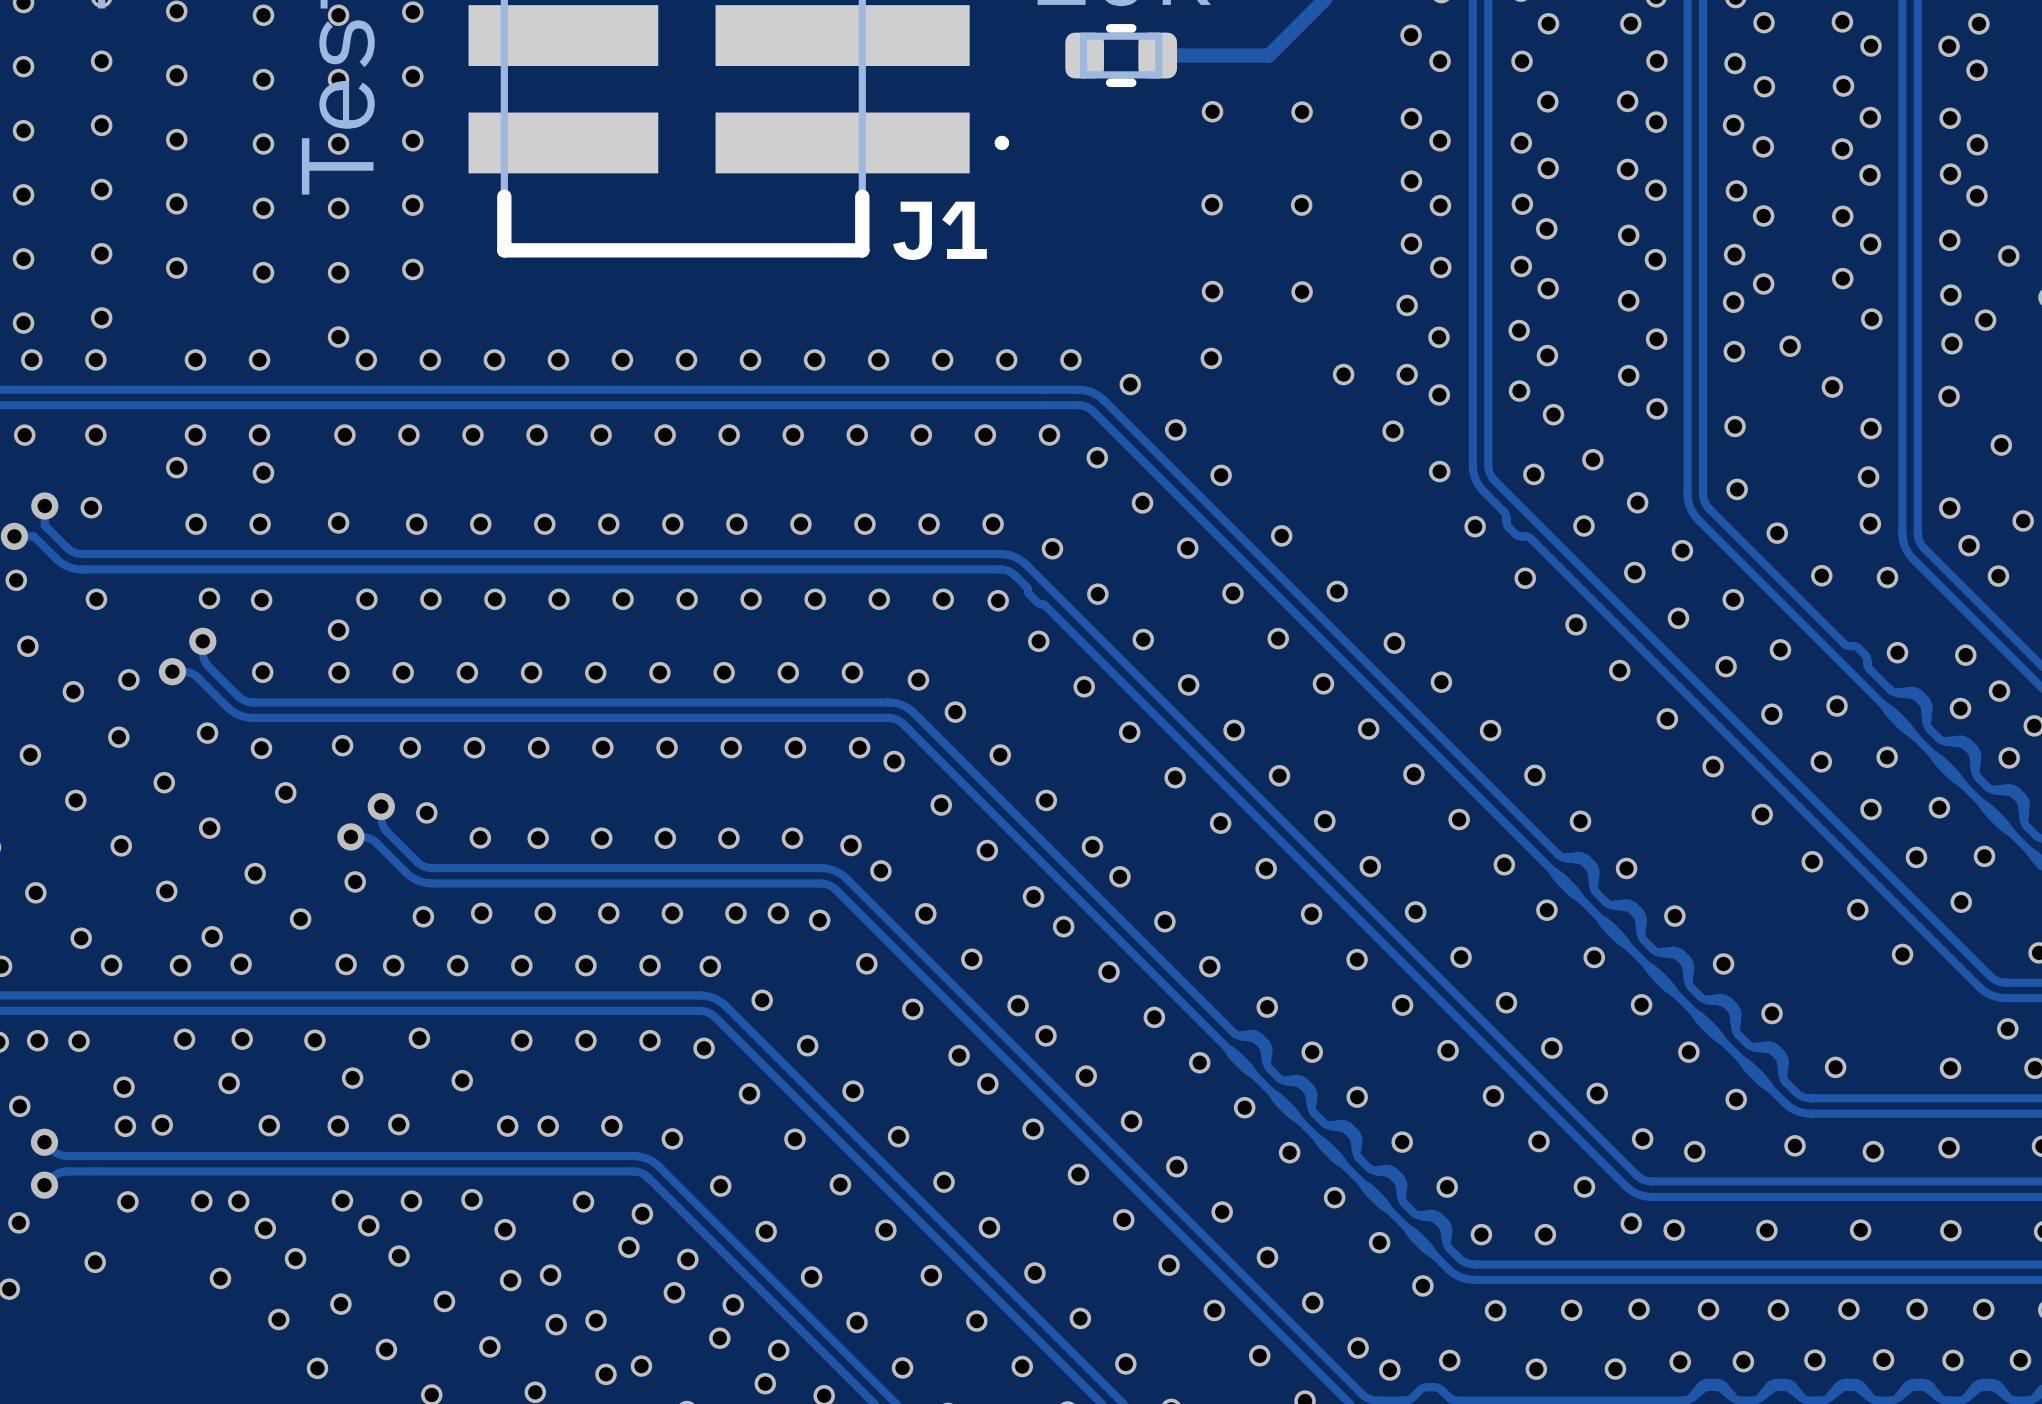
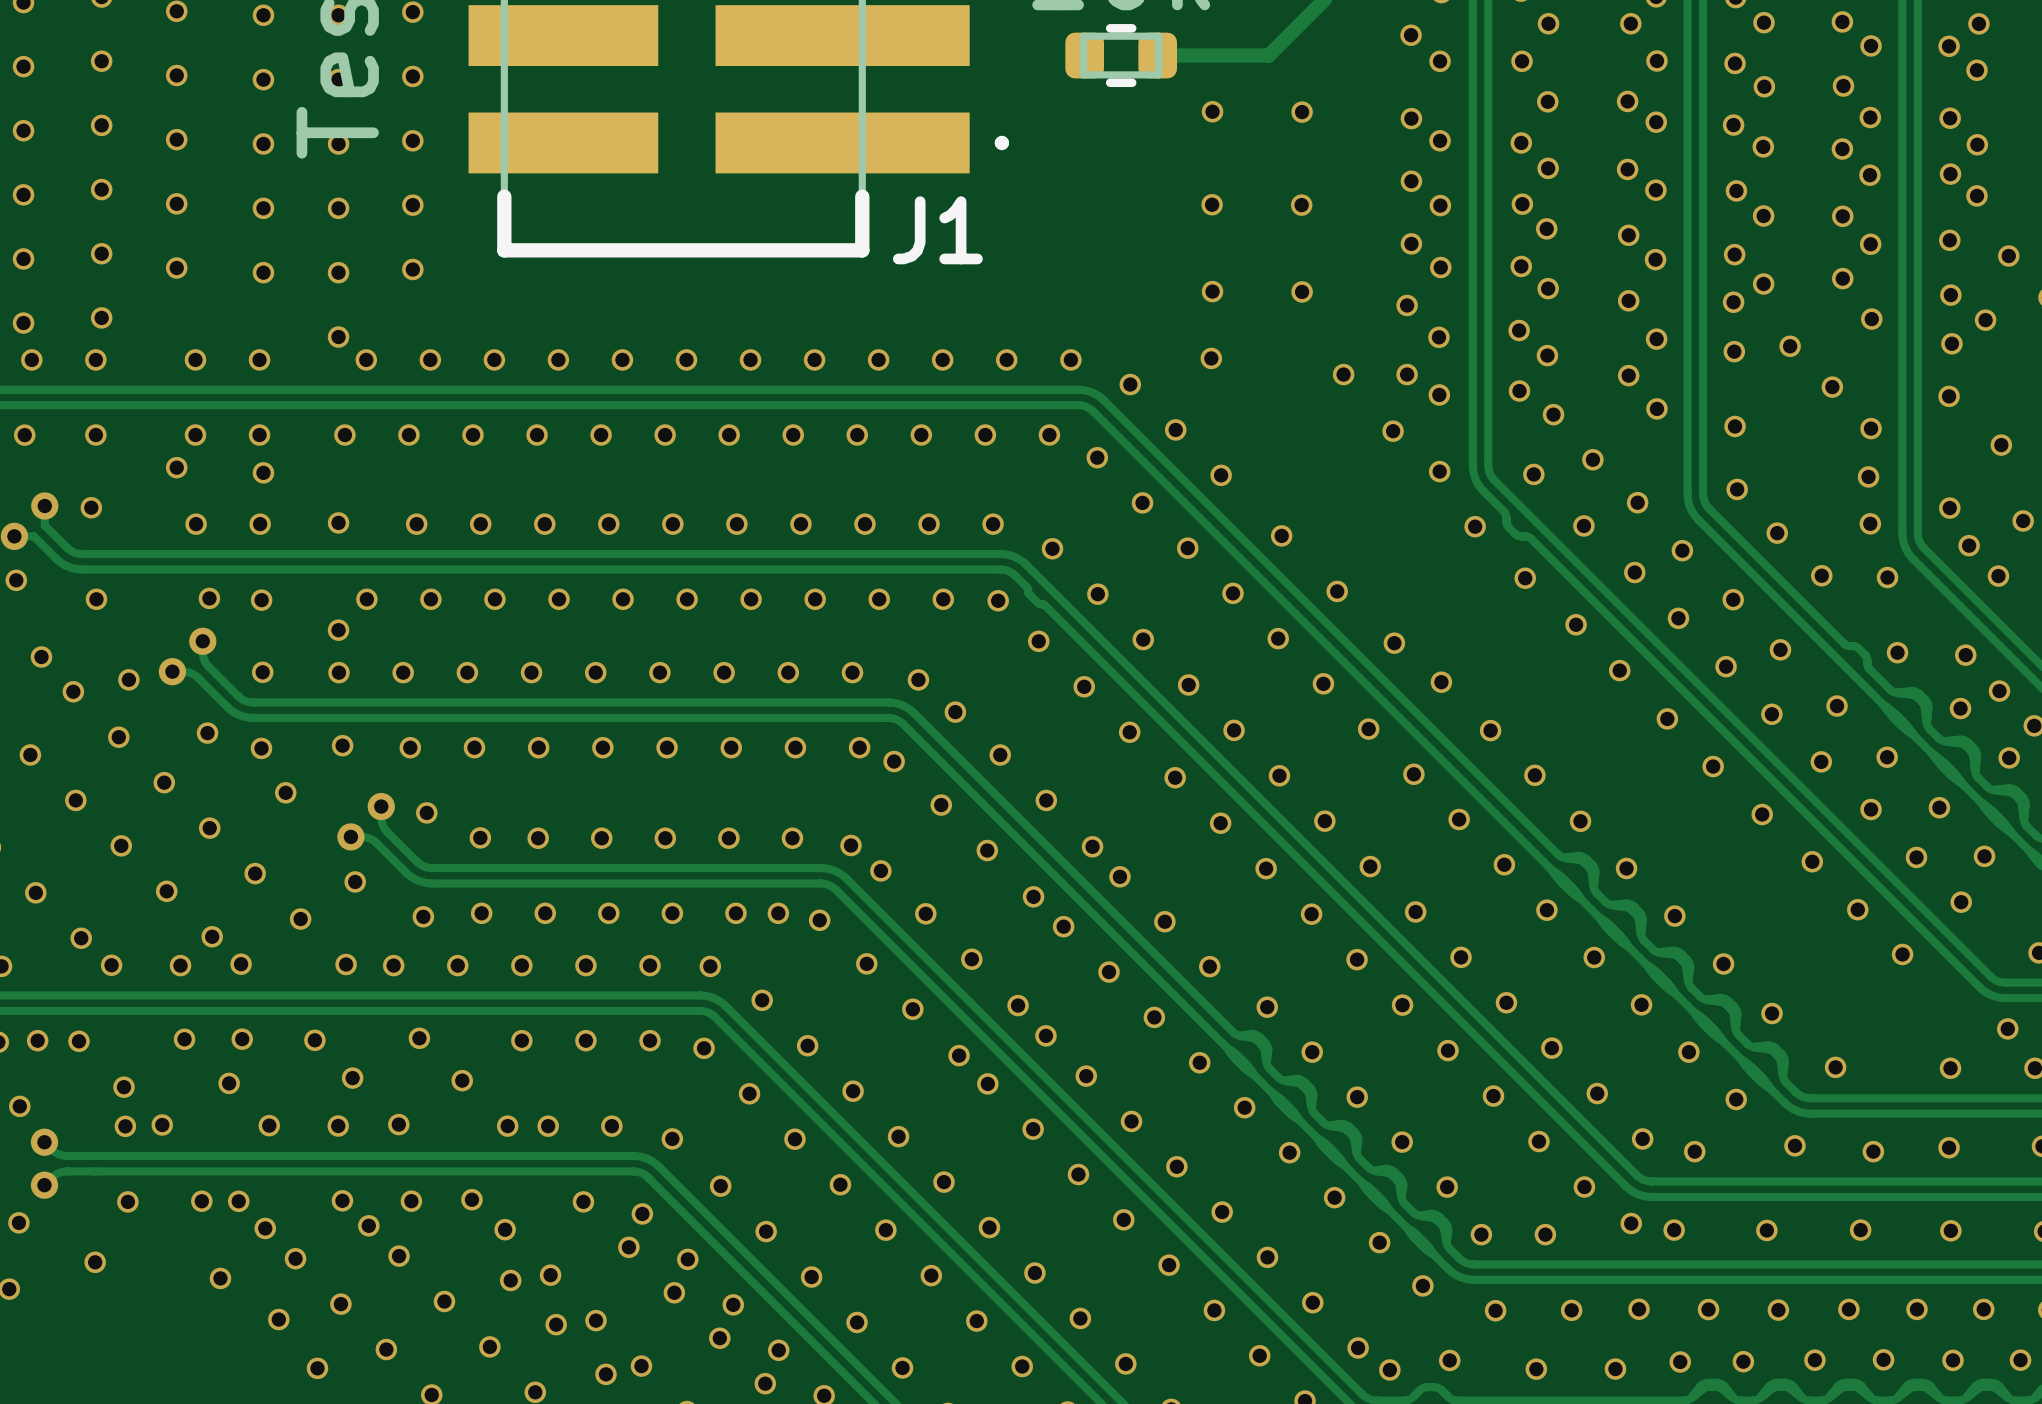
via position: (27, 646) -> (41, 656)

